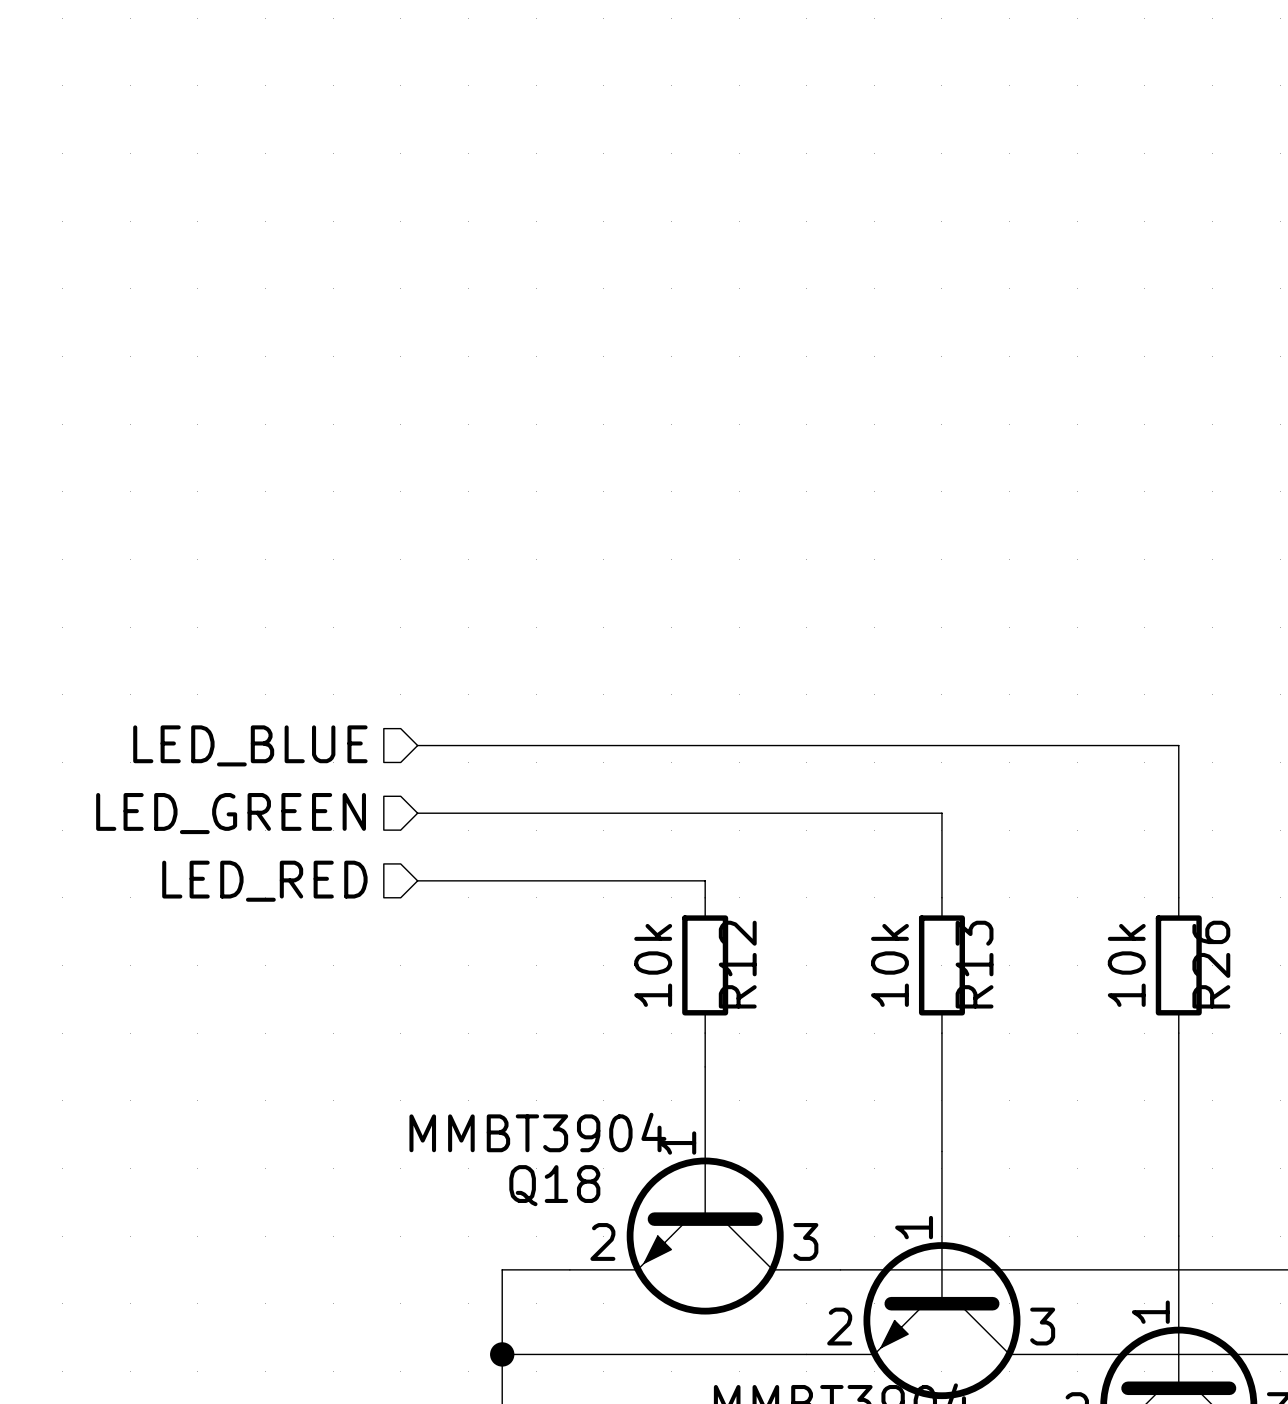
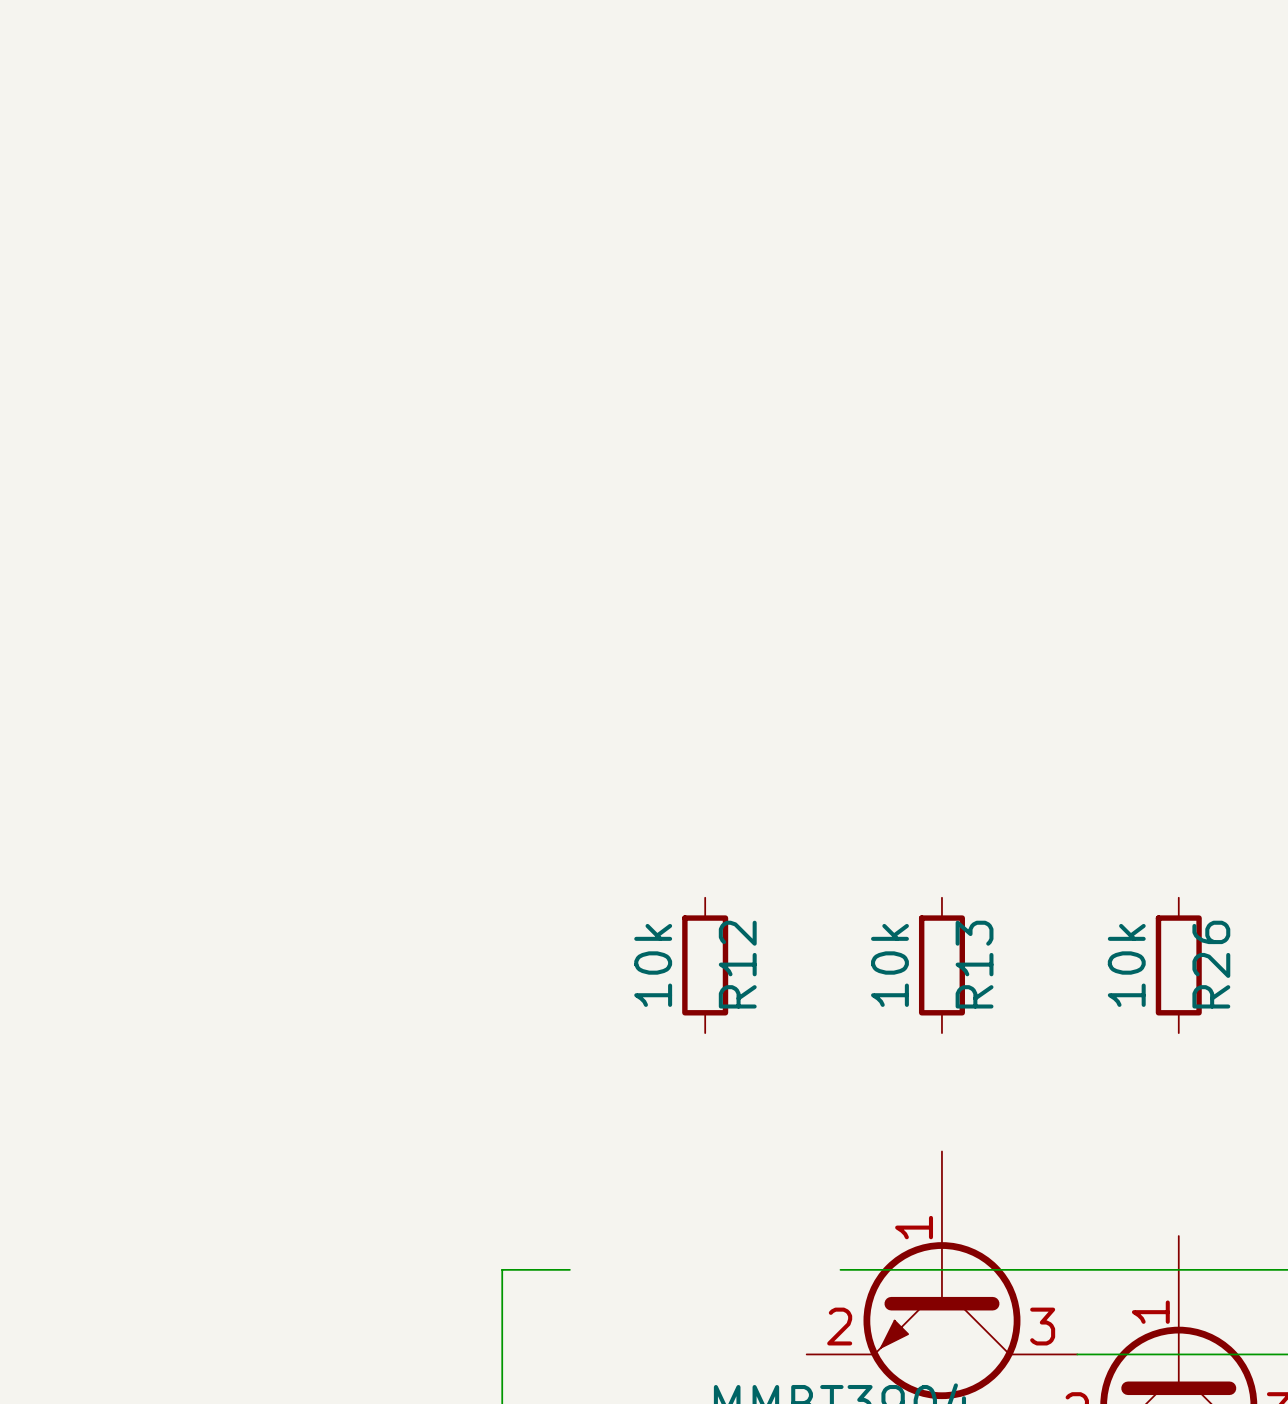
hierarchical label: LED_BLUE (250, 745) -> none
wire: (417, 745) (1178, 745) (1178, 897) -> none
hierarchical label: LED_GREEN (231, 813) -> none
wire: (417, 813) (941, 813) (941, 897) -> none
wire: (417, 880) (705, 880) (705, 897) -> none
hierarchical label: LED_RED (264, 881) -> none
wire: (705, 1033) (705, 1066) -> none
wire: (941, 1033) (941, 1151) -> none
wire: (1178, 1033) (1178, 1236) -> none
Q18: MMBT3904 (705, 1190) -> none
wire: (502, 1354) (806, 1354) -> none
junction: (502, 1354) -> none

